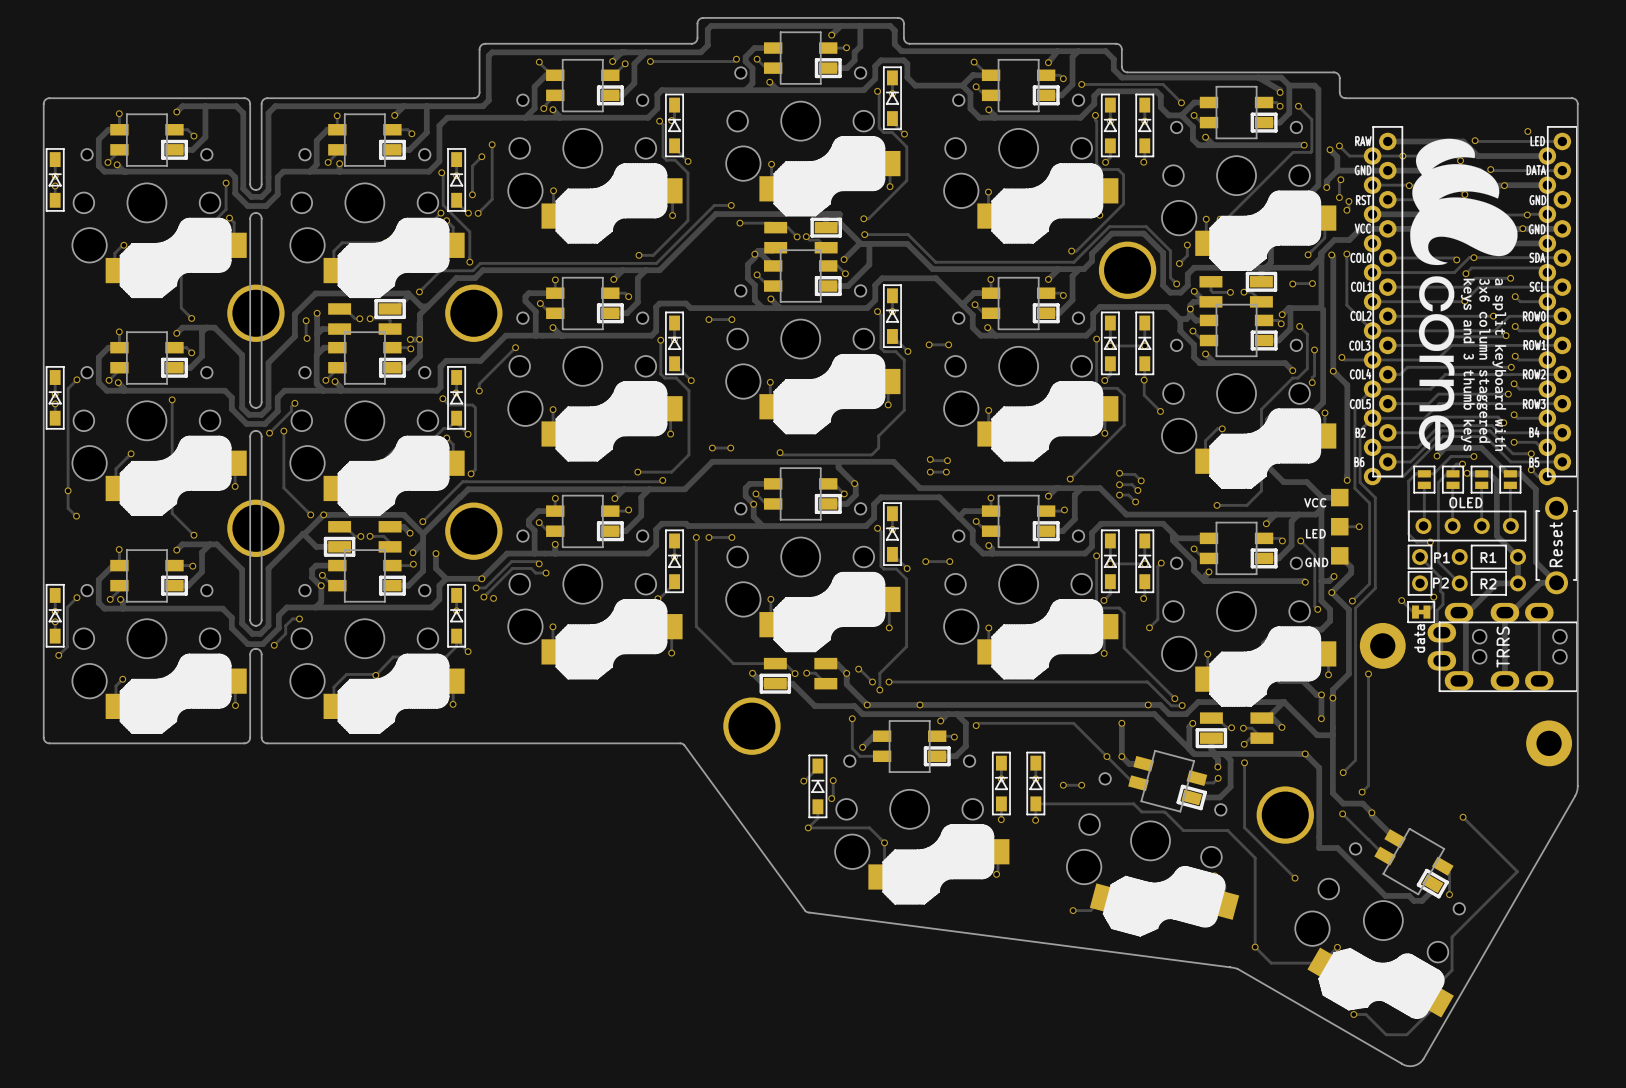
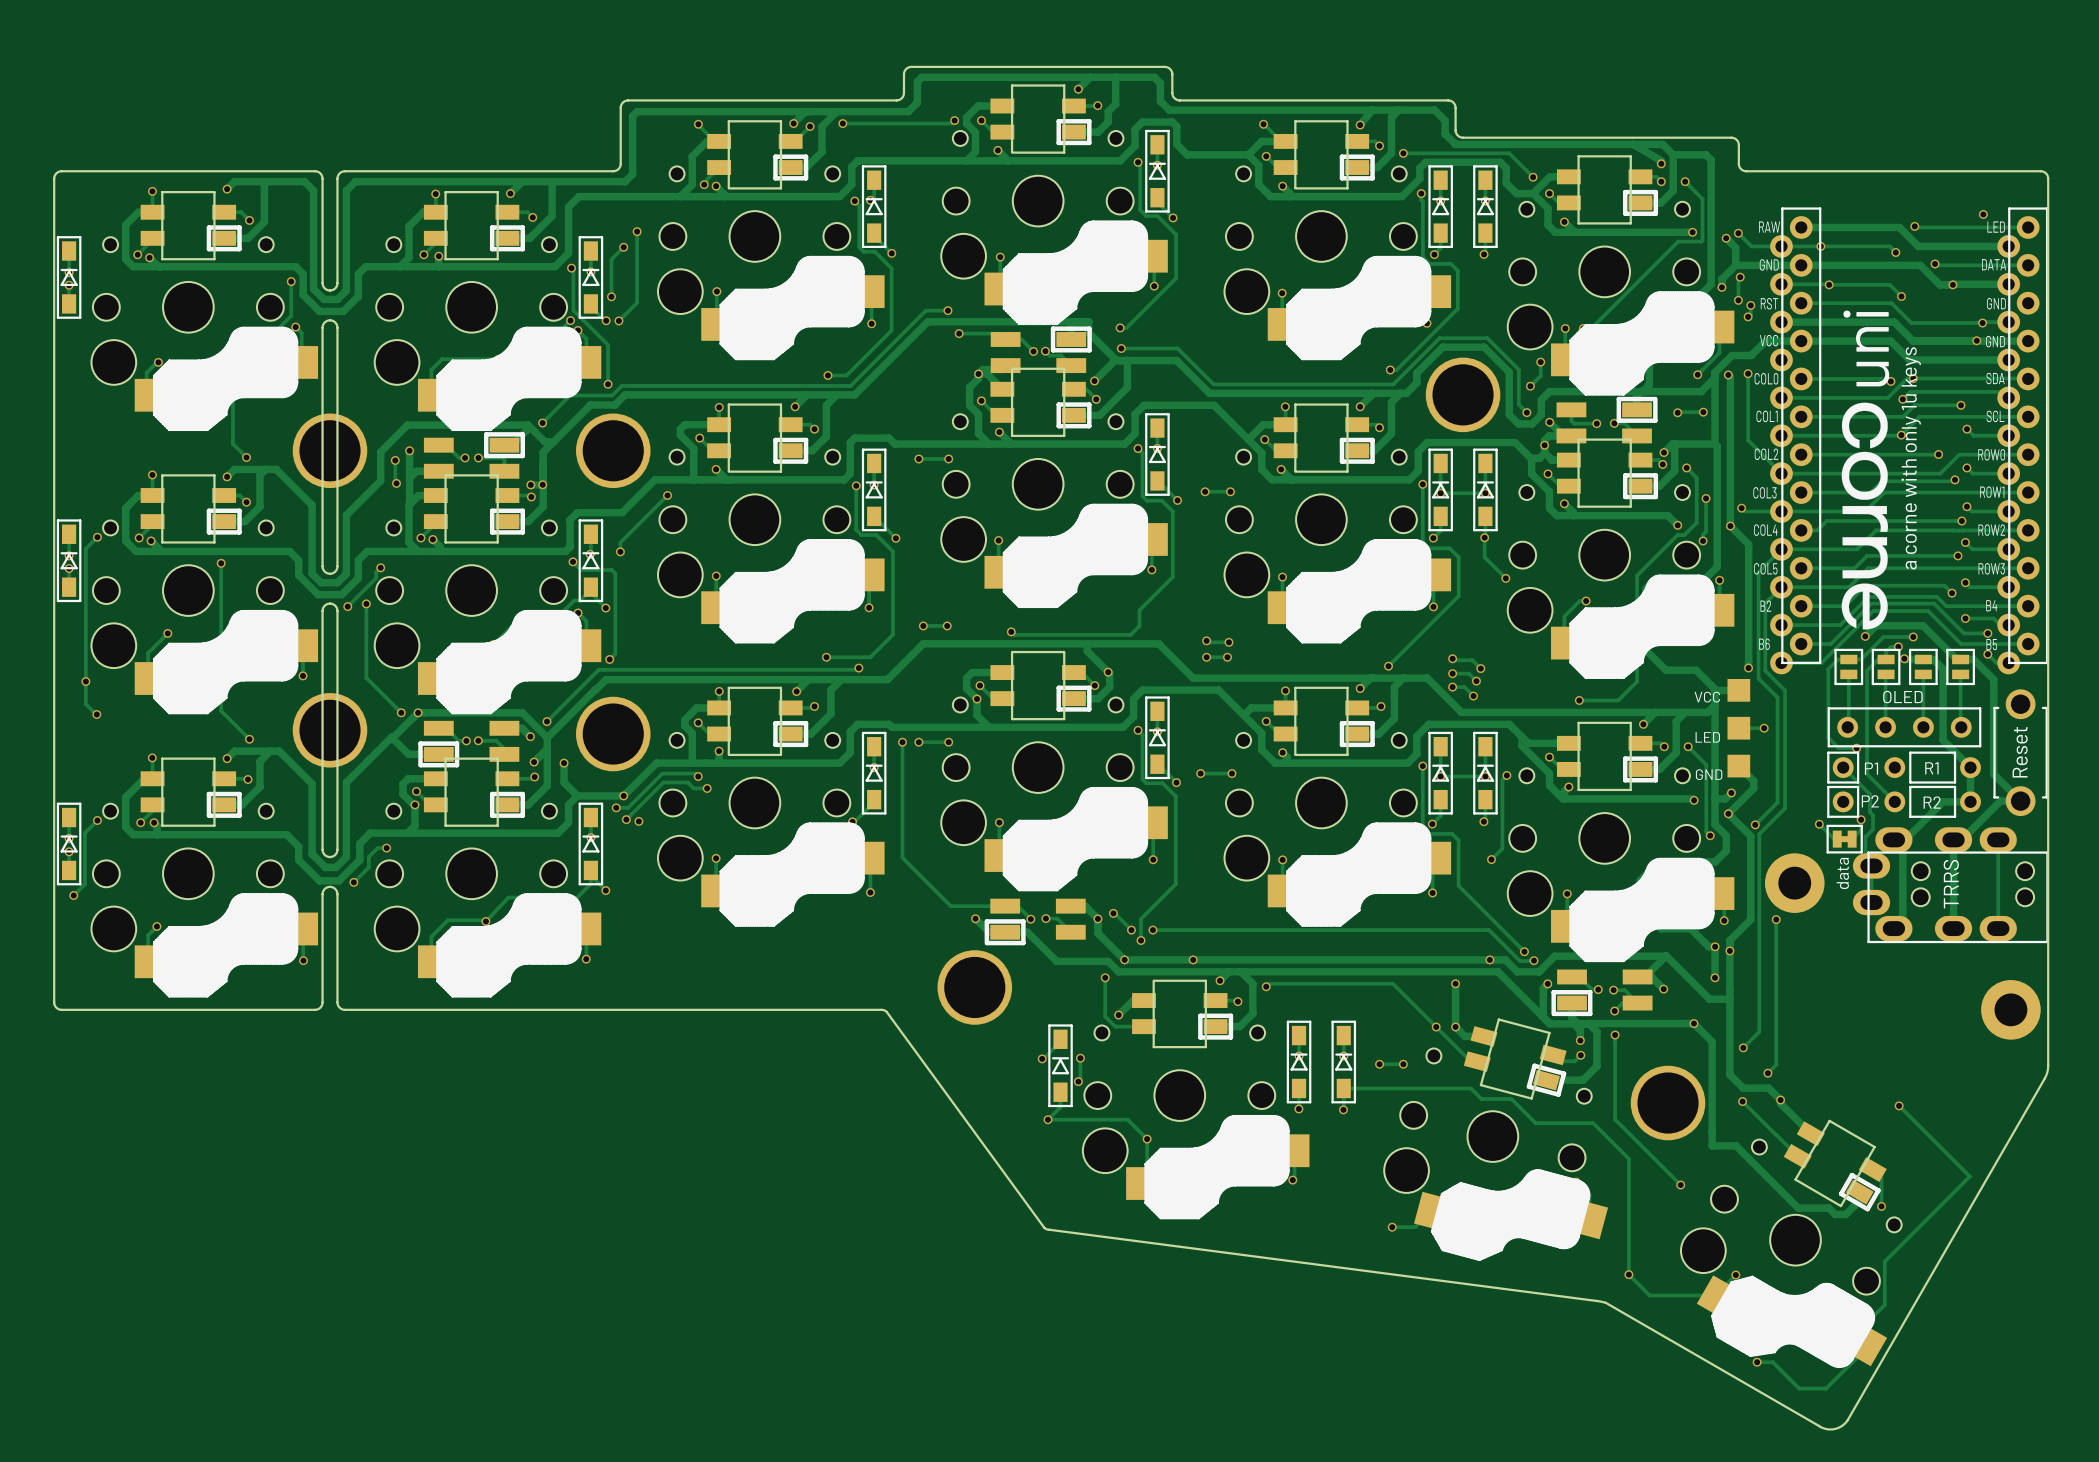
drawing: [1410, 138, 1518, 452] -> none
drawing: none -> [1841, 402, 1889, 630]

